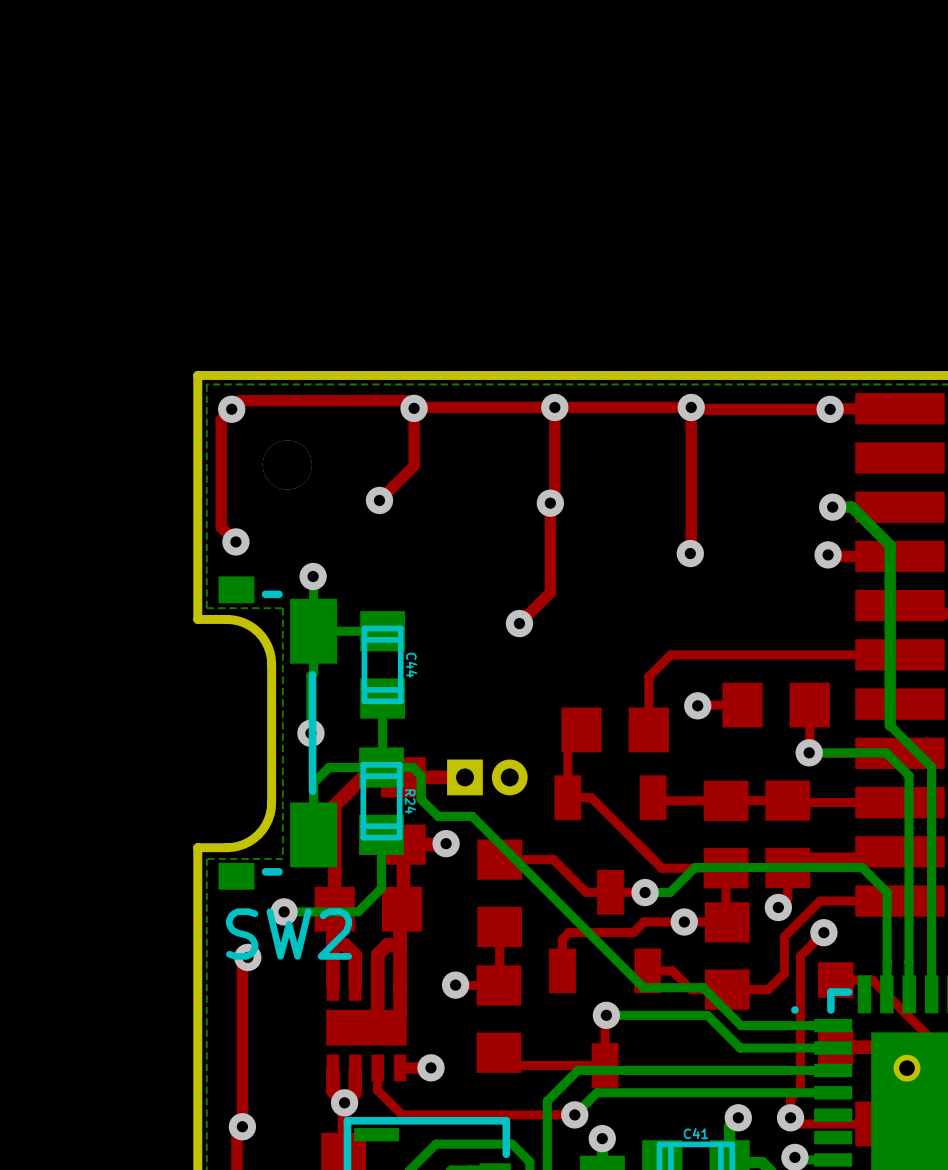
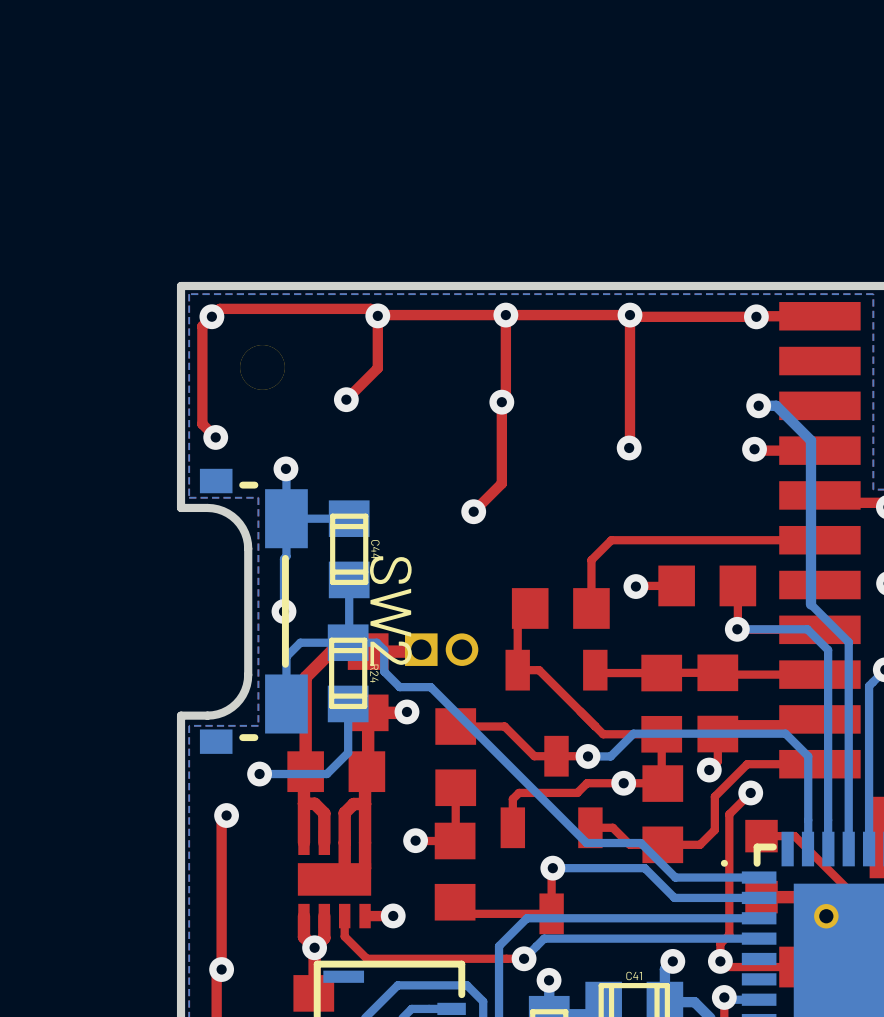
part footprint: [447, 759, 528, 796] -> [405, 633, 479, 666]
SW2 name rotation: 0° (289, 934) -> 90° clockwise (390, 611)
SW2 name position: SW2 (289, 934) -> SW2 (390, 611)

